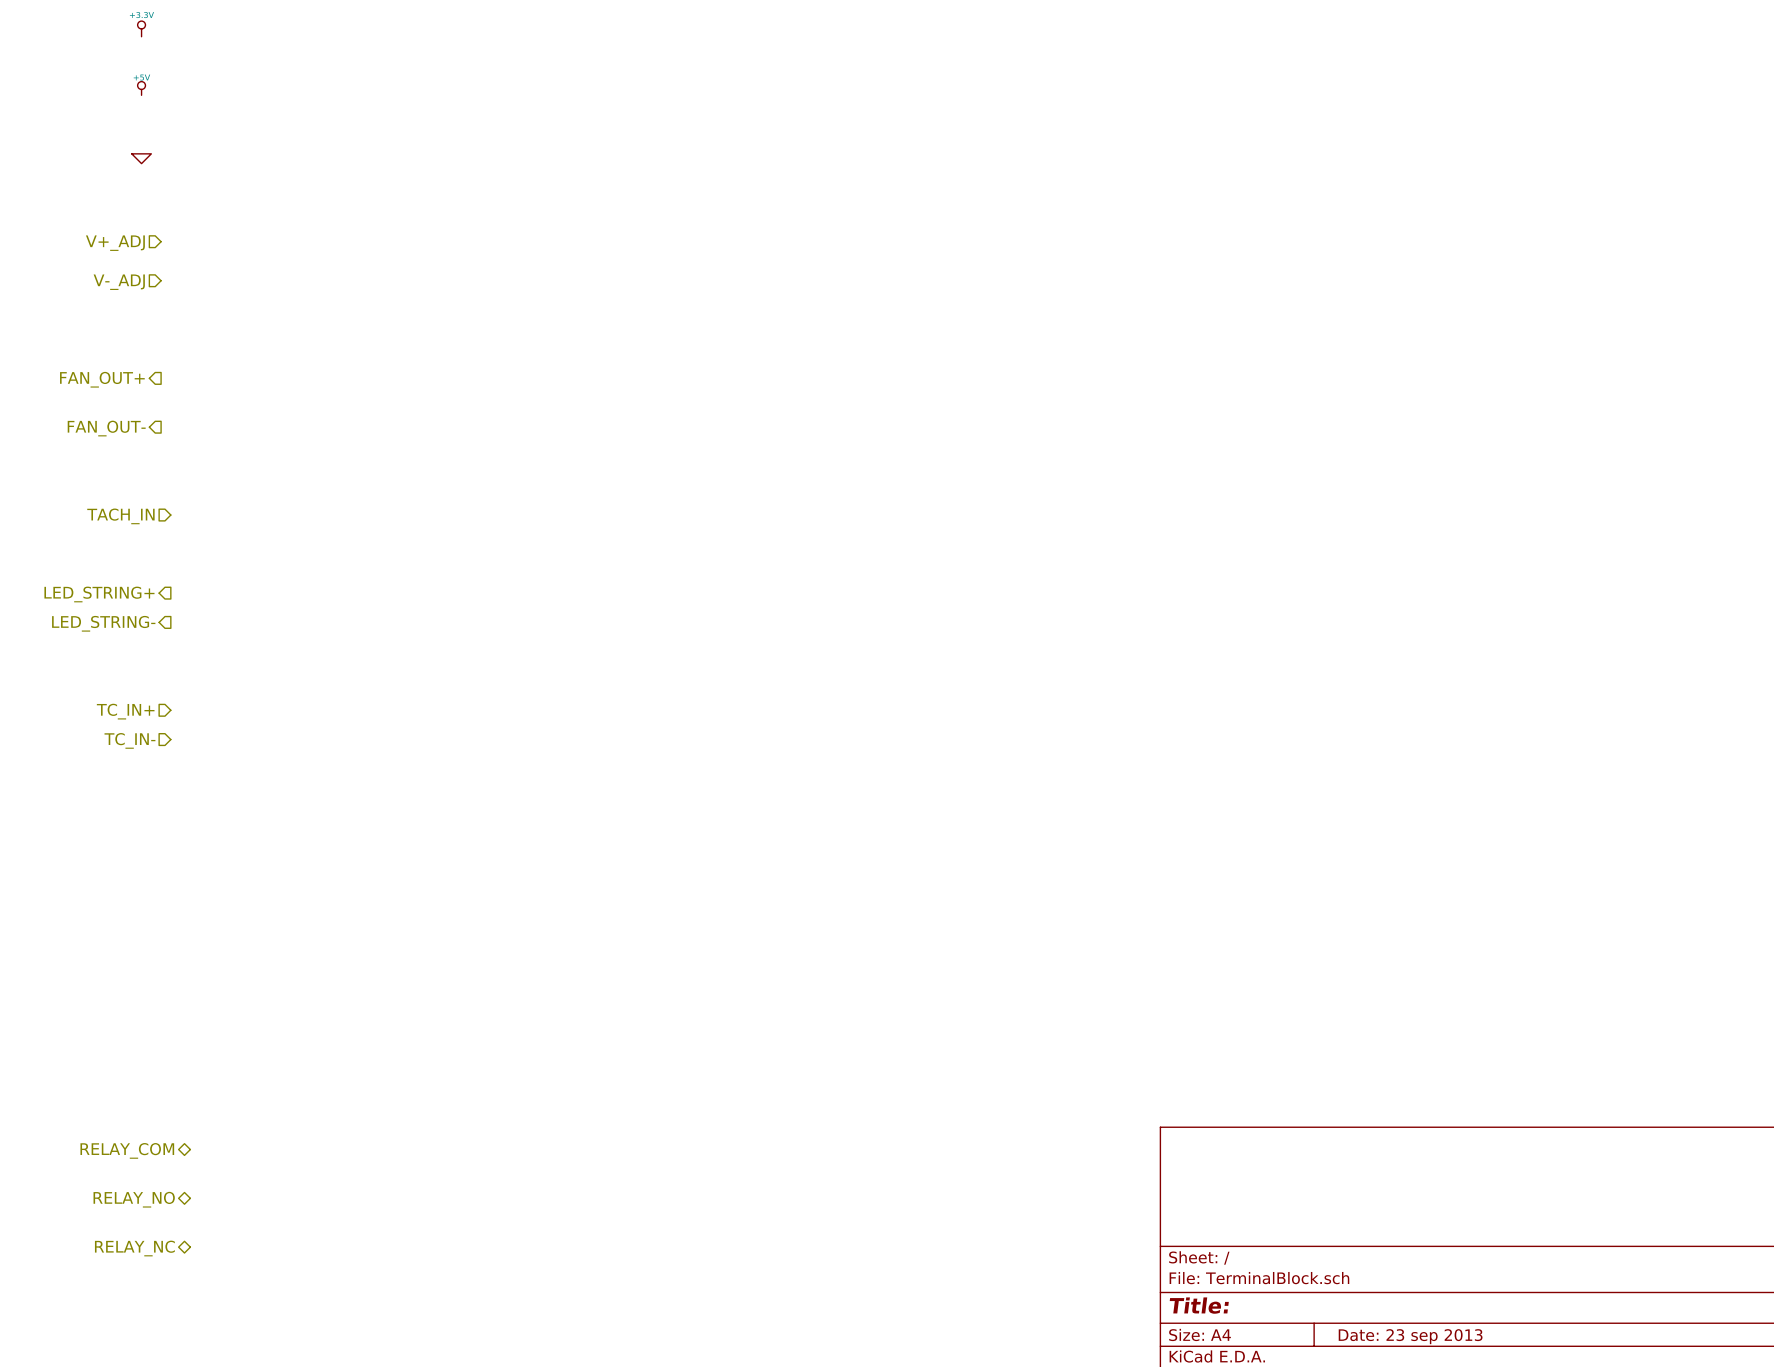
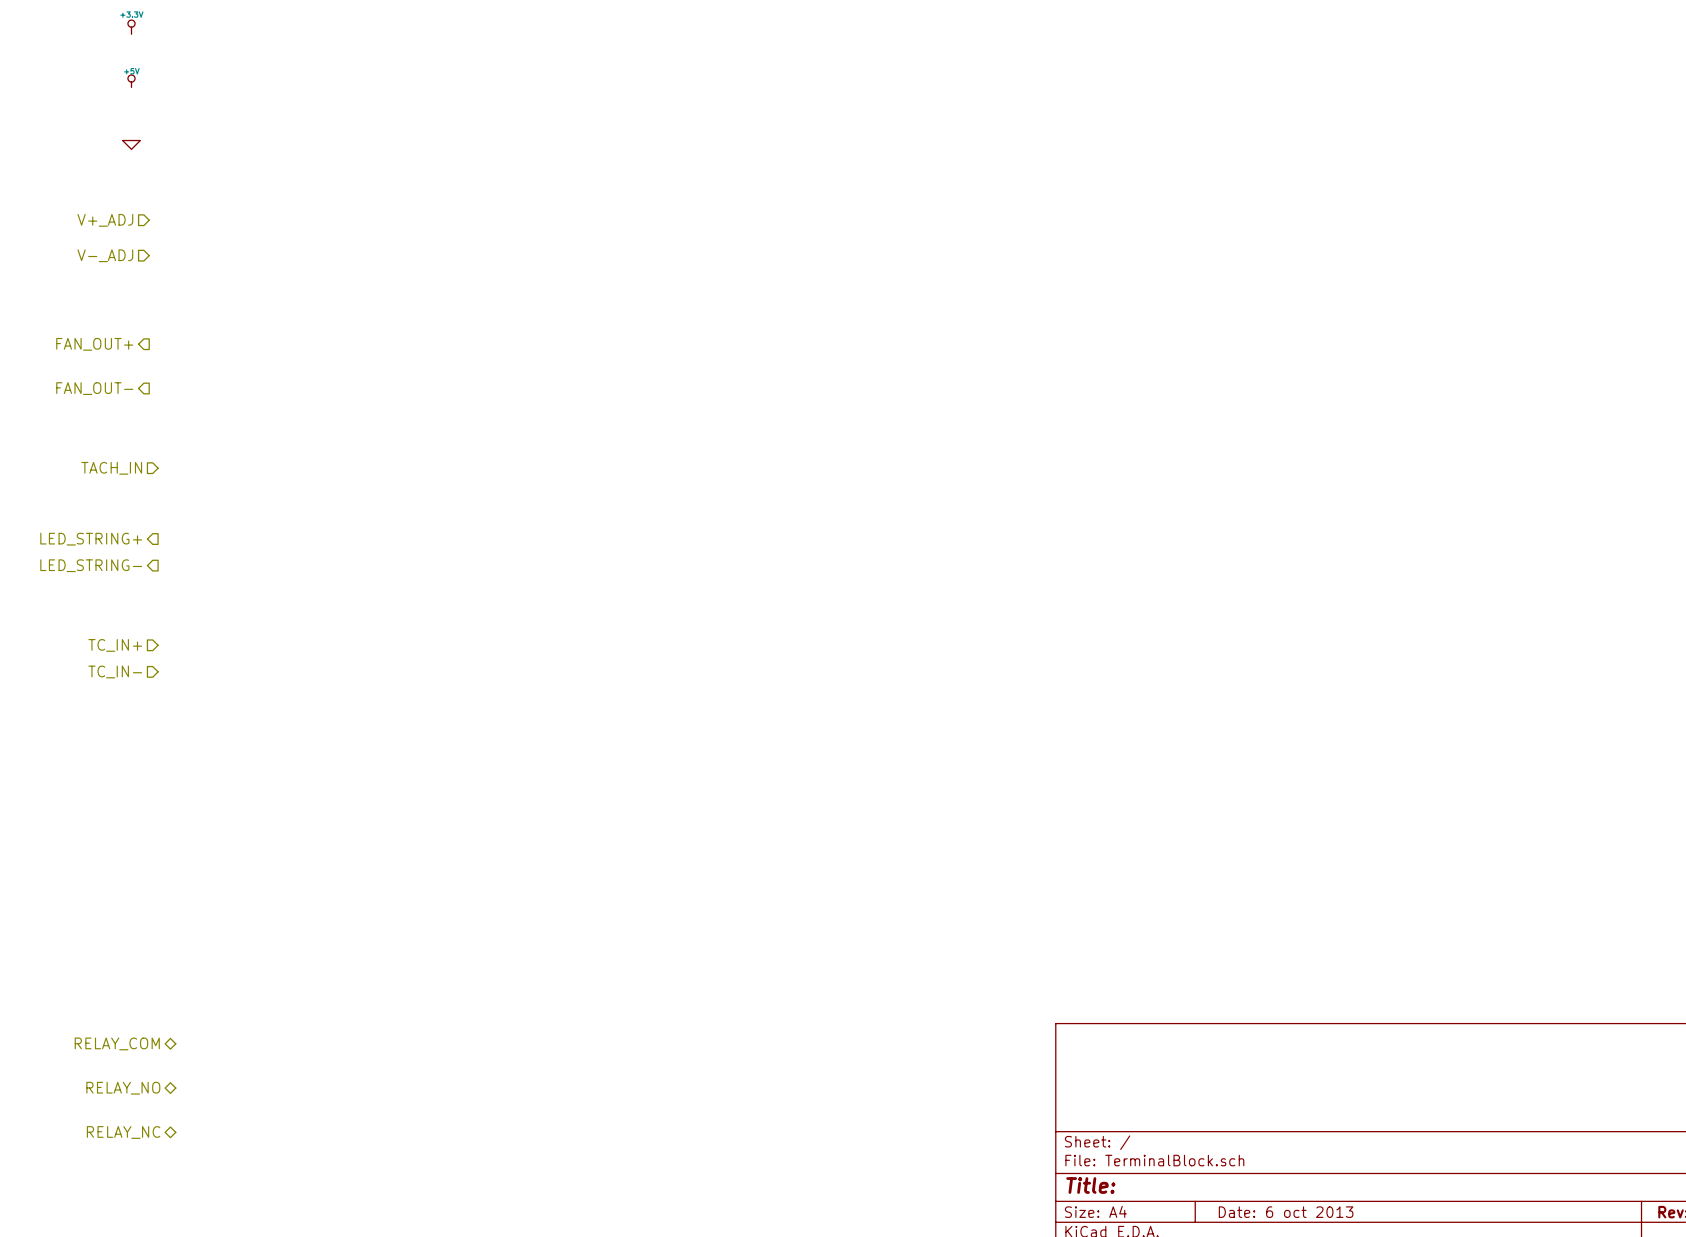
title block: Date: 23 sep 2013 (1410, 1336) -> Date: 6 oct 2013 (1286, 1212)

